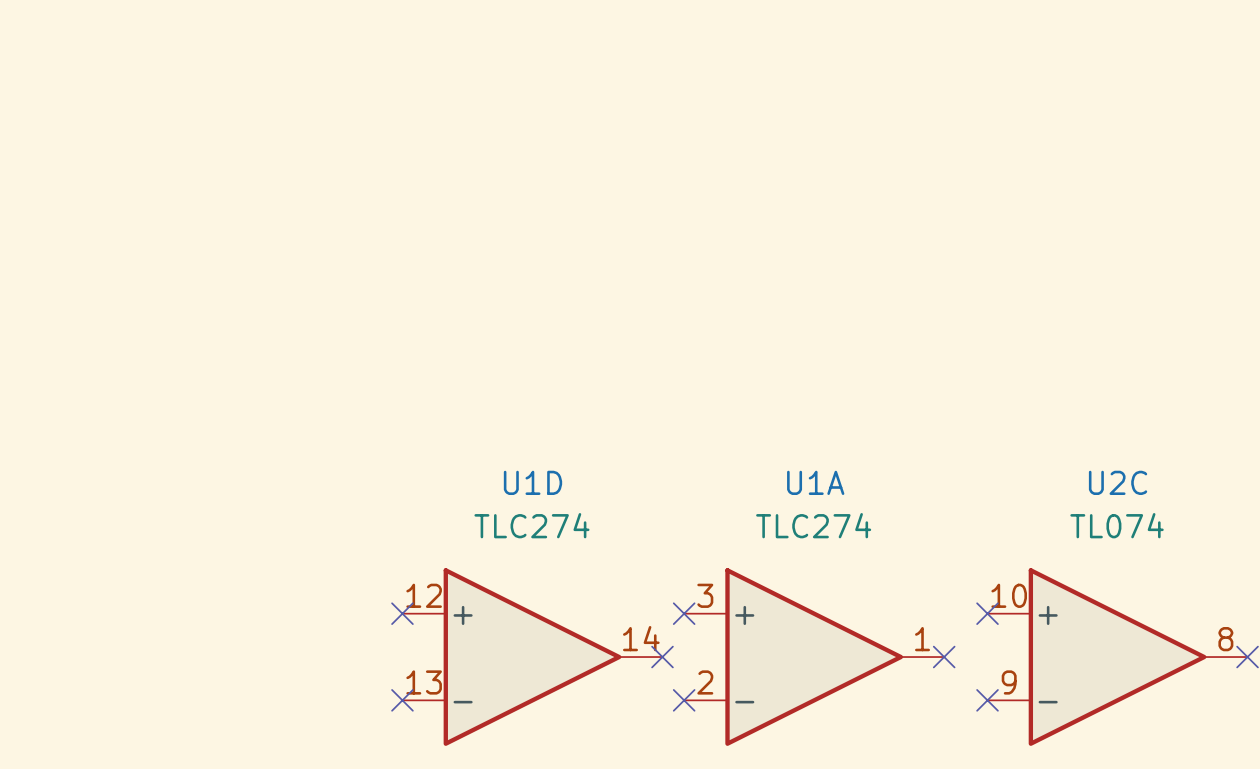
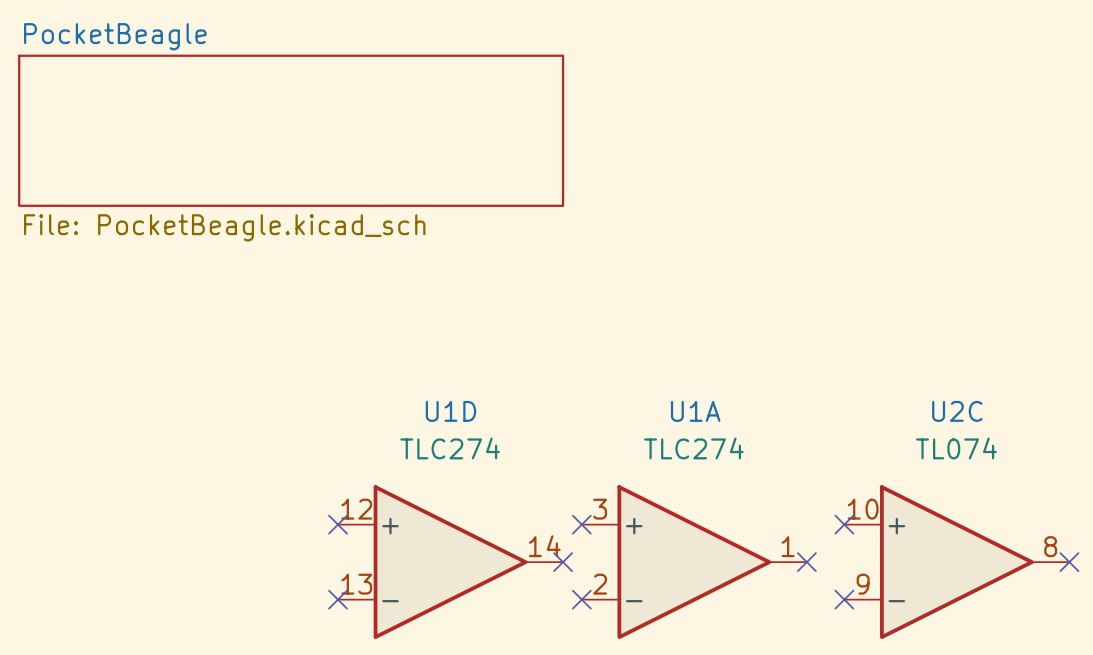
sheet PocketBeagle: none -> File: PocketBeagle.kicad_sch (291, 130)

